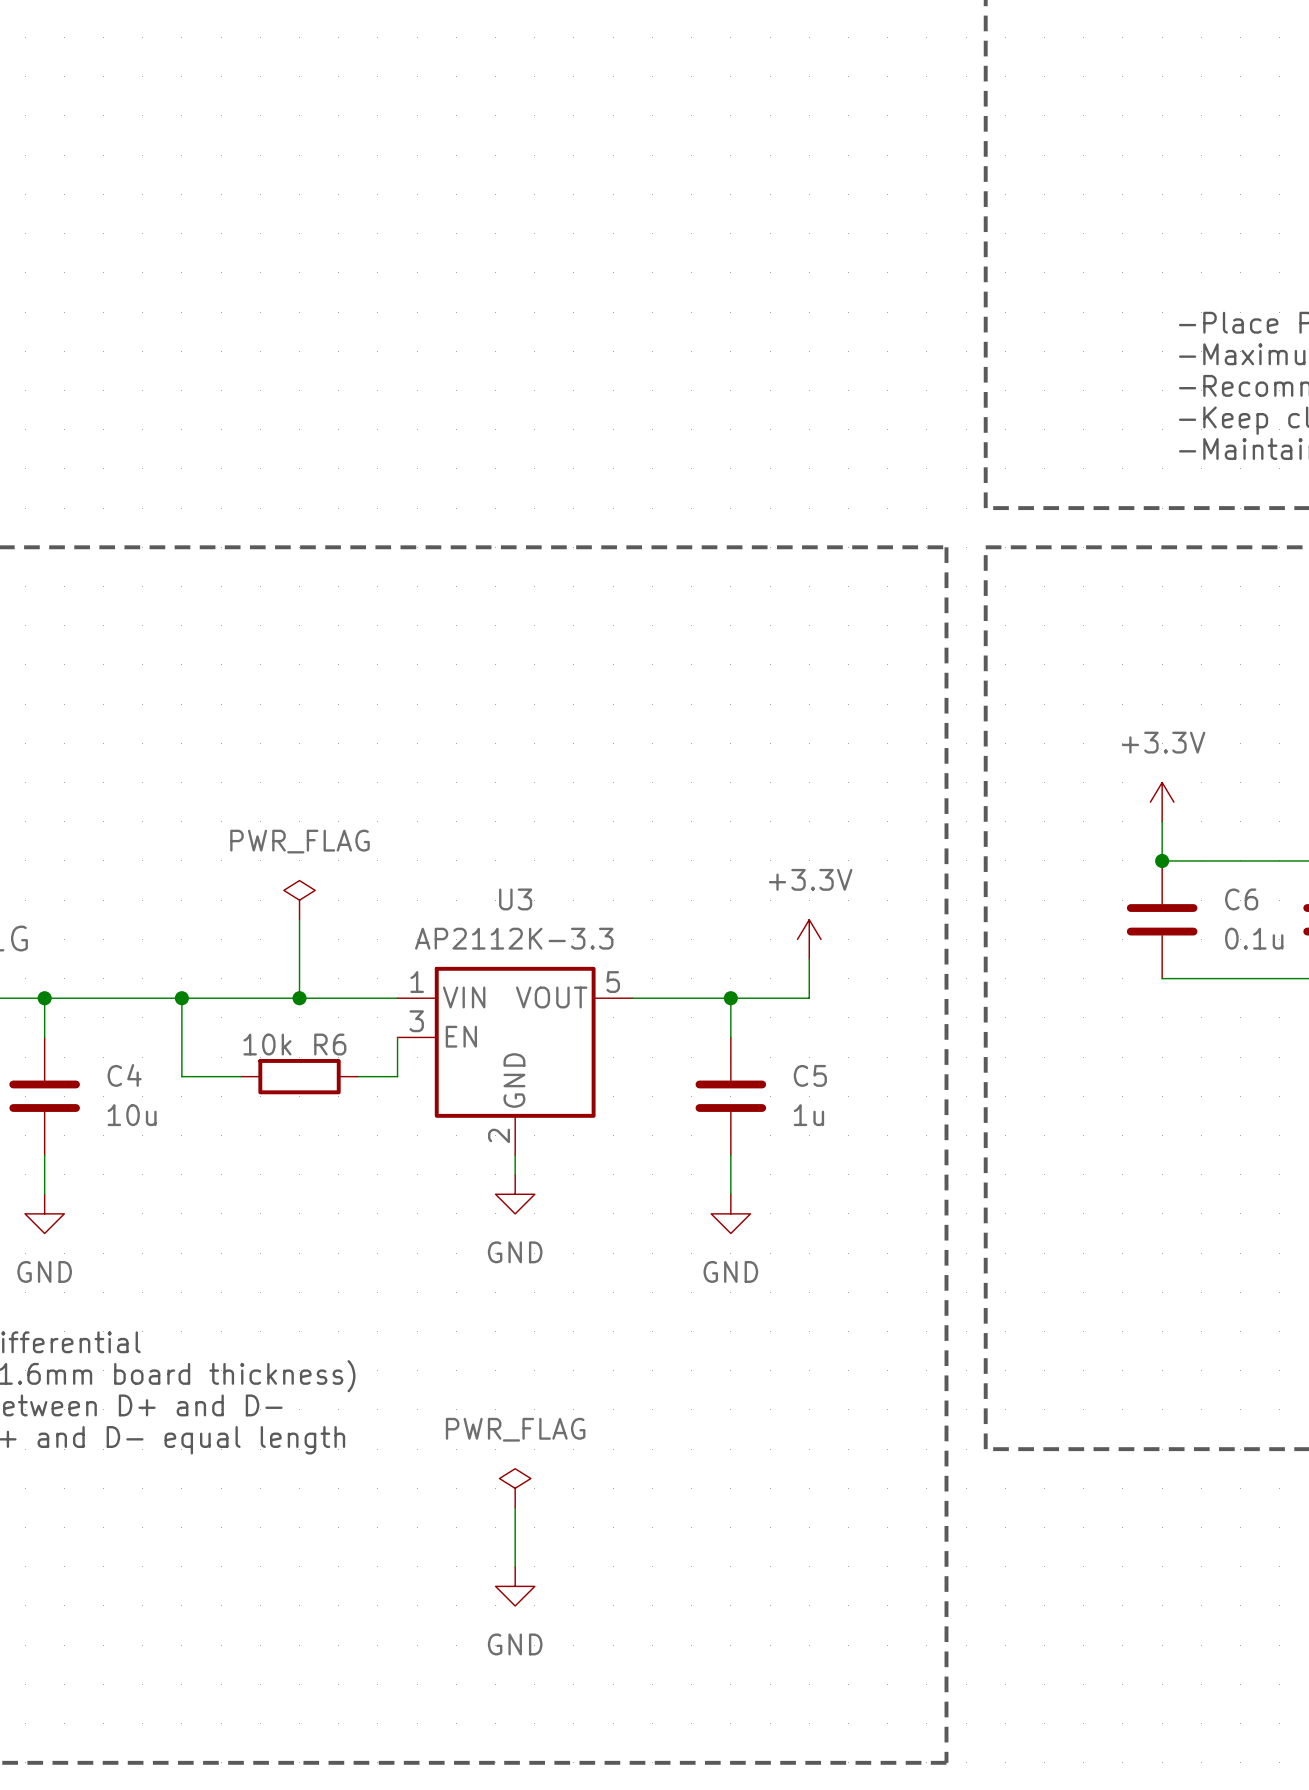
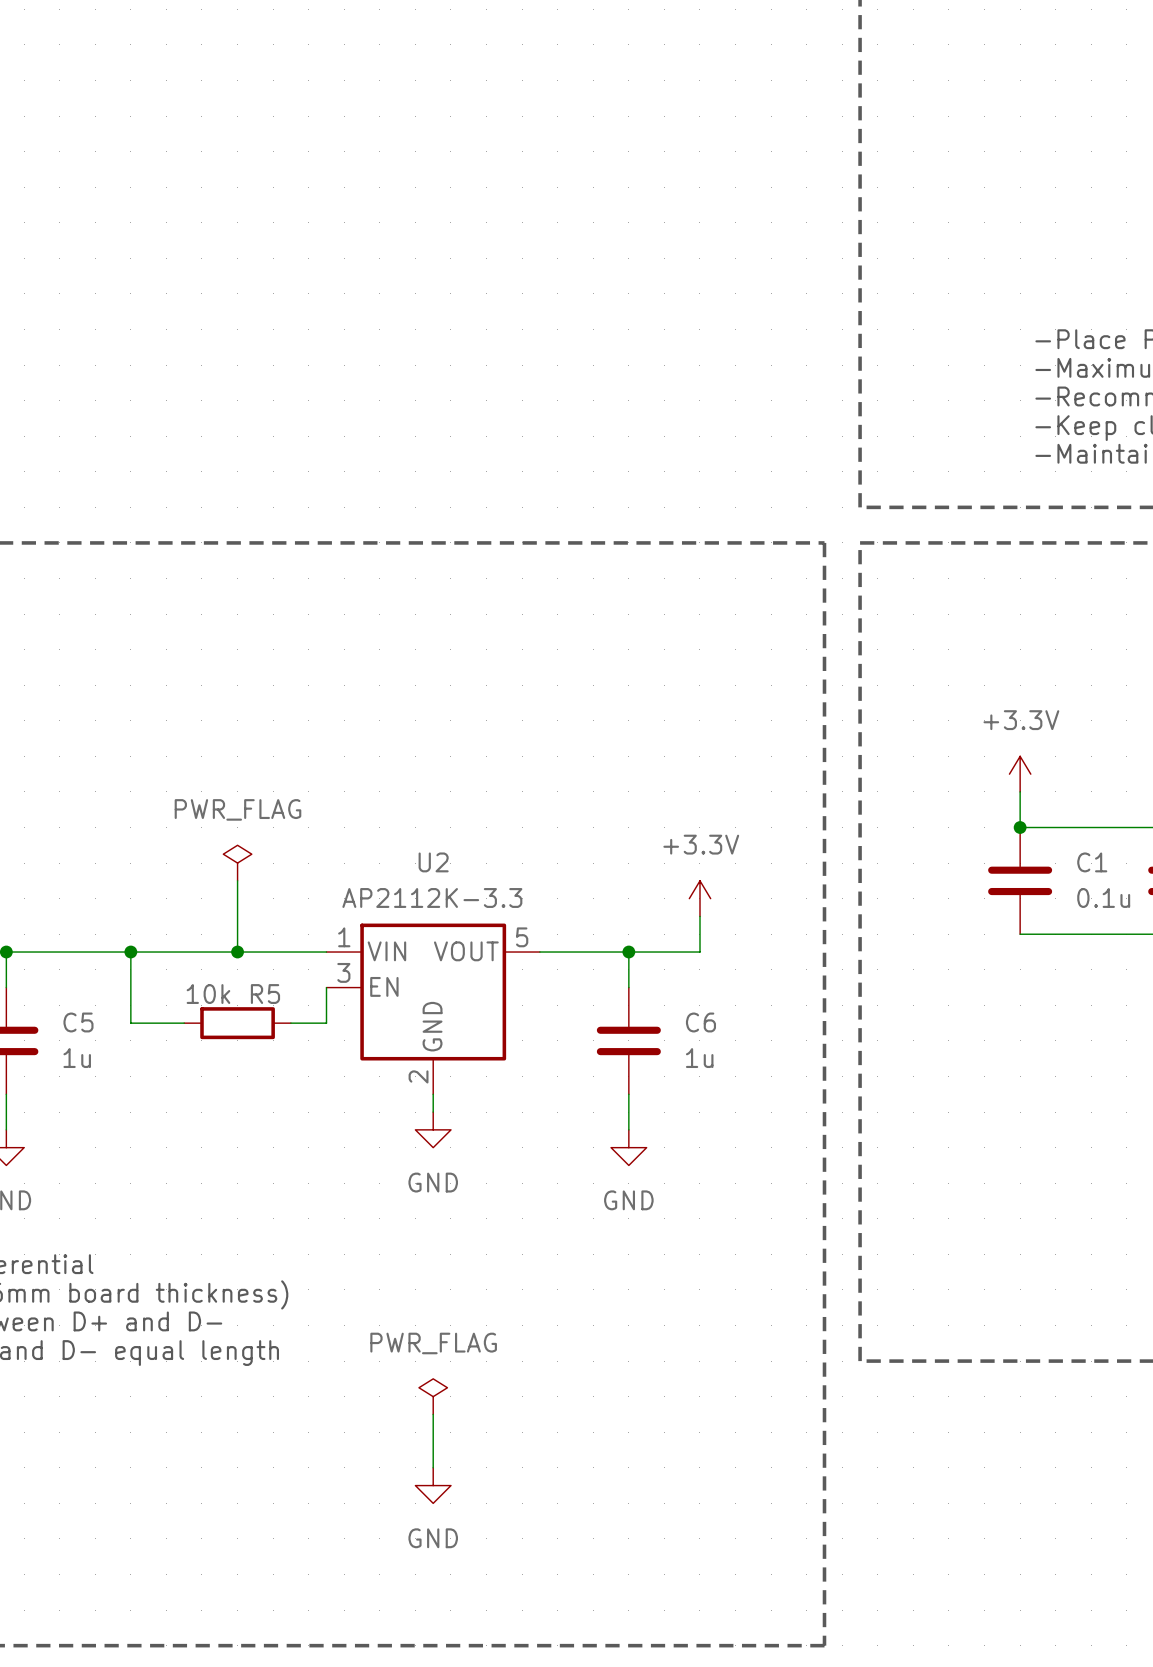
U3 name: U3 (515, 899) -> U2 (433, 862)
C6 name: C6 (1241, 899) -> C1 (1092, 862)
R6 name: R6 (330, 1044) -> R5 (265, 994)
C4 name: C4 (124, 1075) -> C5 (78, 1022)
C5 name: C5 (810, 1075) -> C6 (700, 1022)
C4 value: 10u (132, 1115) -> 1u (77, 1058)

